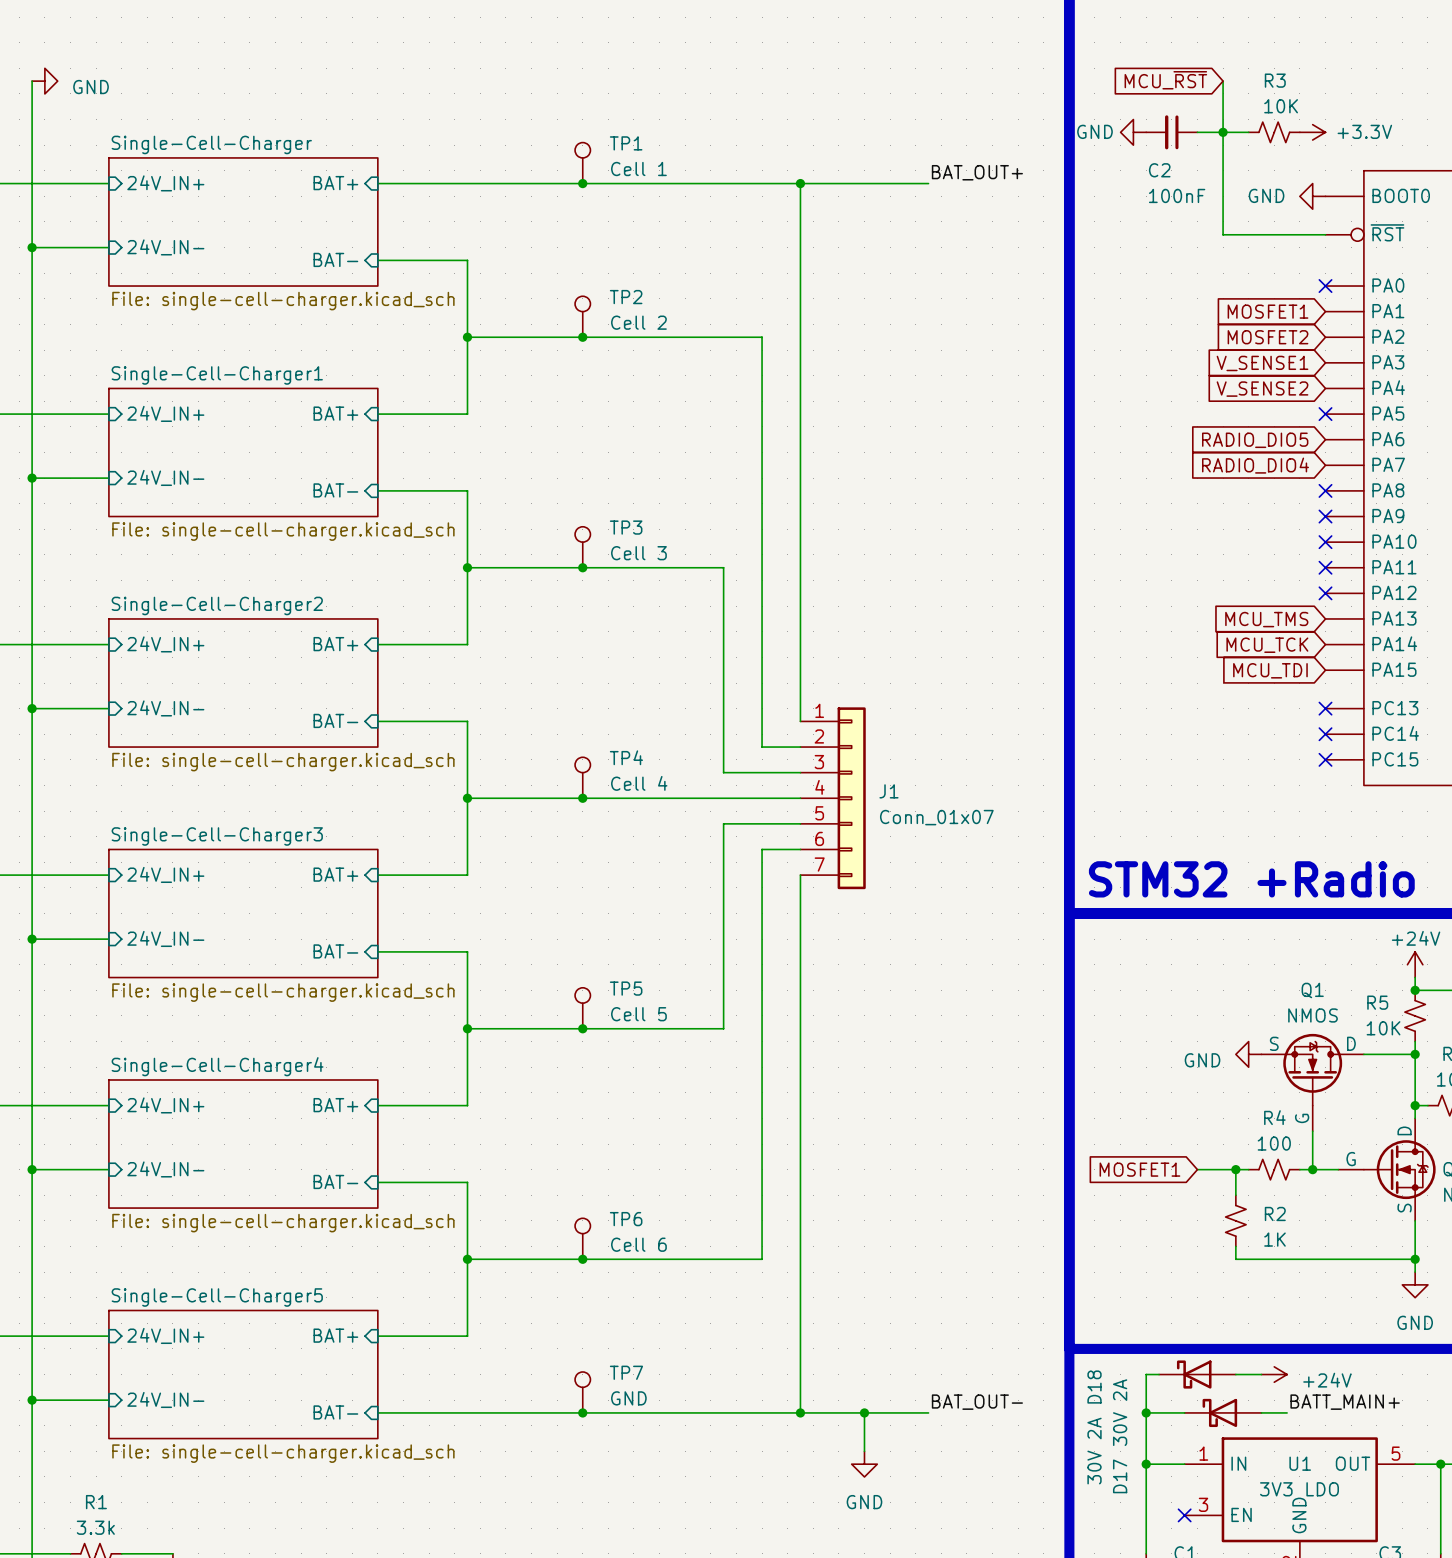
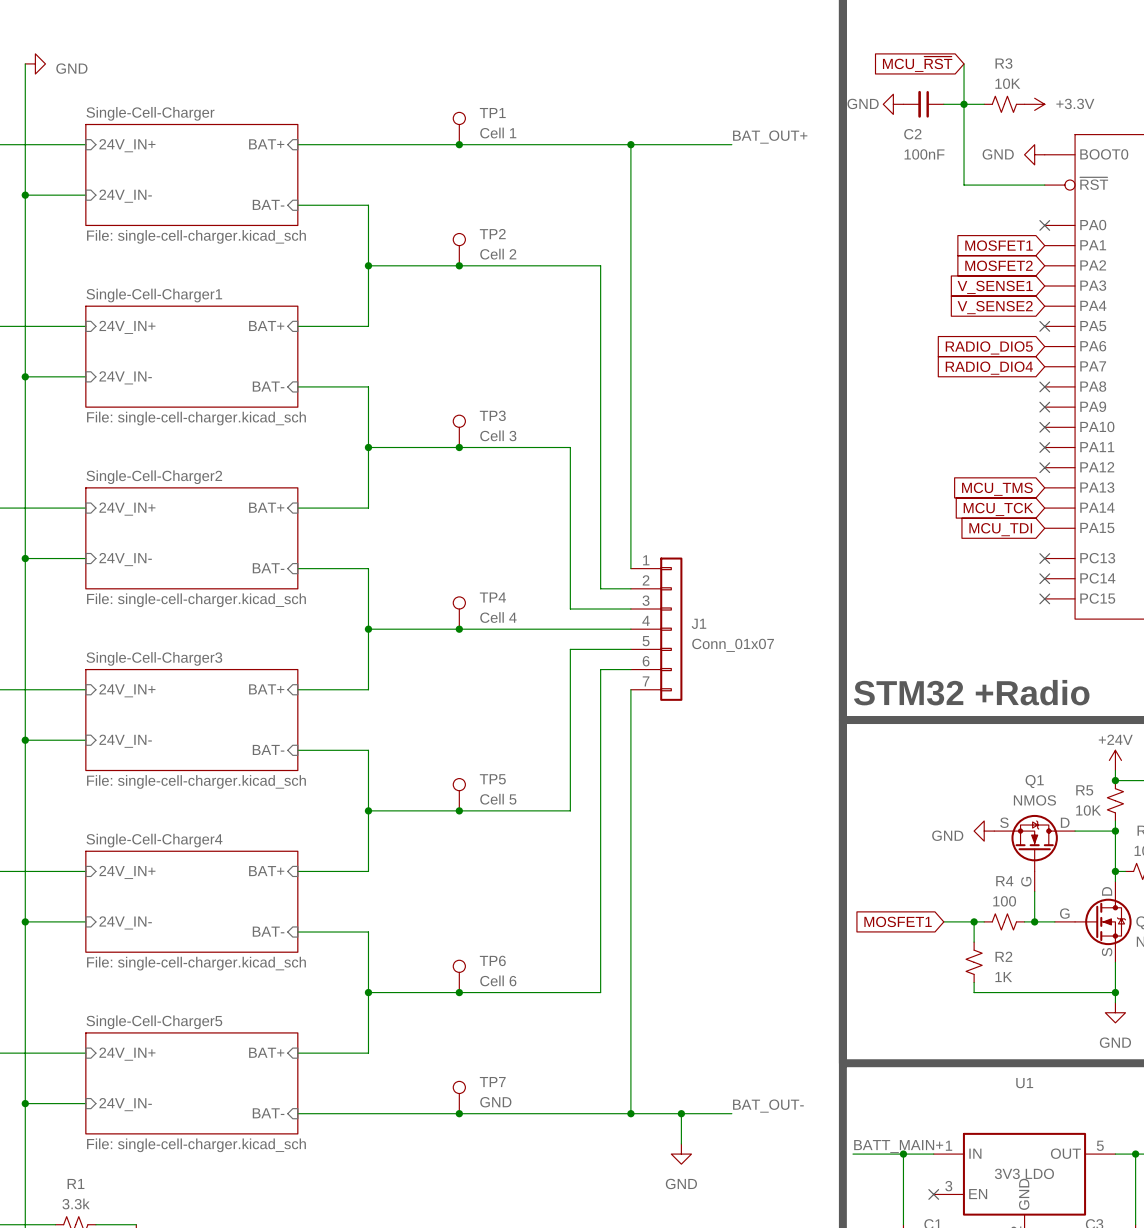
wire: (1159, 1374) (1146, 1374) (1146, 1464) -> (852, 1154) (903, 1154)
D18: 30V 2A (1197, 1374) -> none
wire: (1235, 1374) (1261, 1374) -> none
power symbol: +24V (1274, 1374) -> none
label position: BATT_MAIN+ (1345, 1402) -> BATT_MAIN+ (898, 1146)
wire: (1146, 1412) (1184, 1412) -> none
junction: (1146, 1412) -> none
D17: 30V 2A (1223, 1412) -> none
wire: (1261, 1412) (1287, 1412) -> none
U1 name position: U1 (1300, 1463) -> U1 (1024, 1083)

